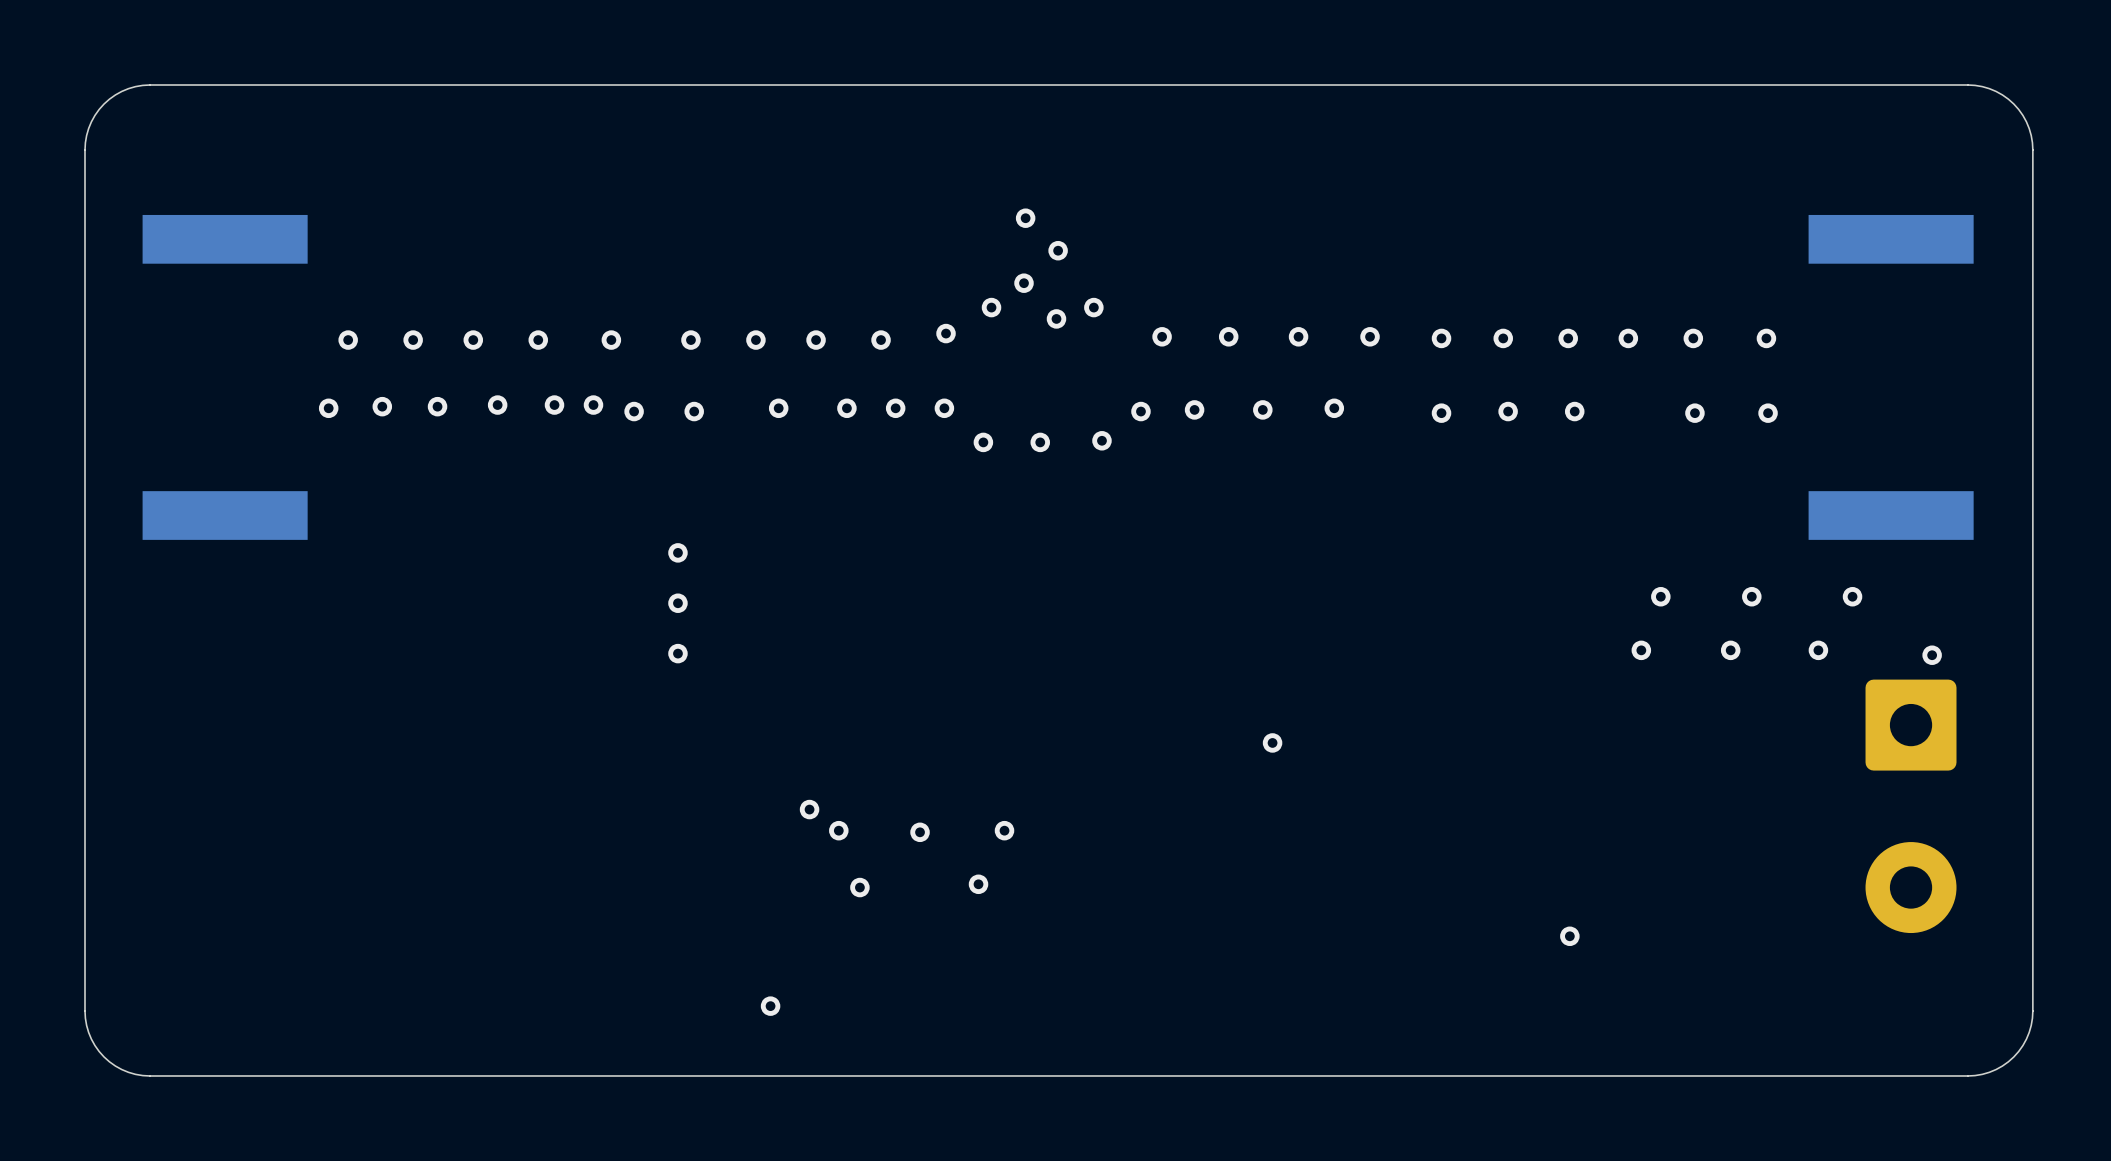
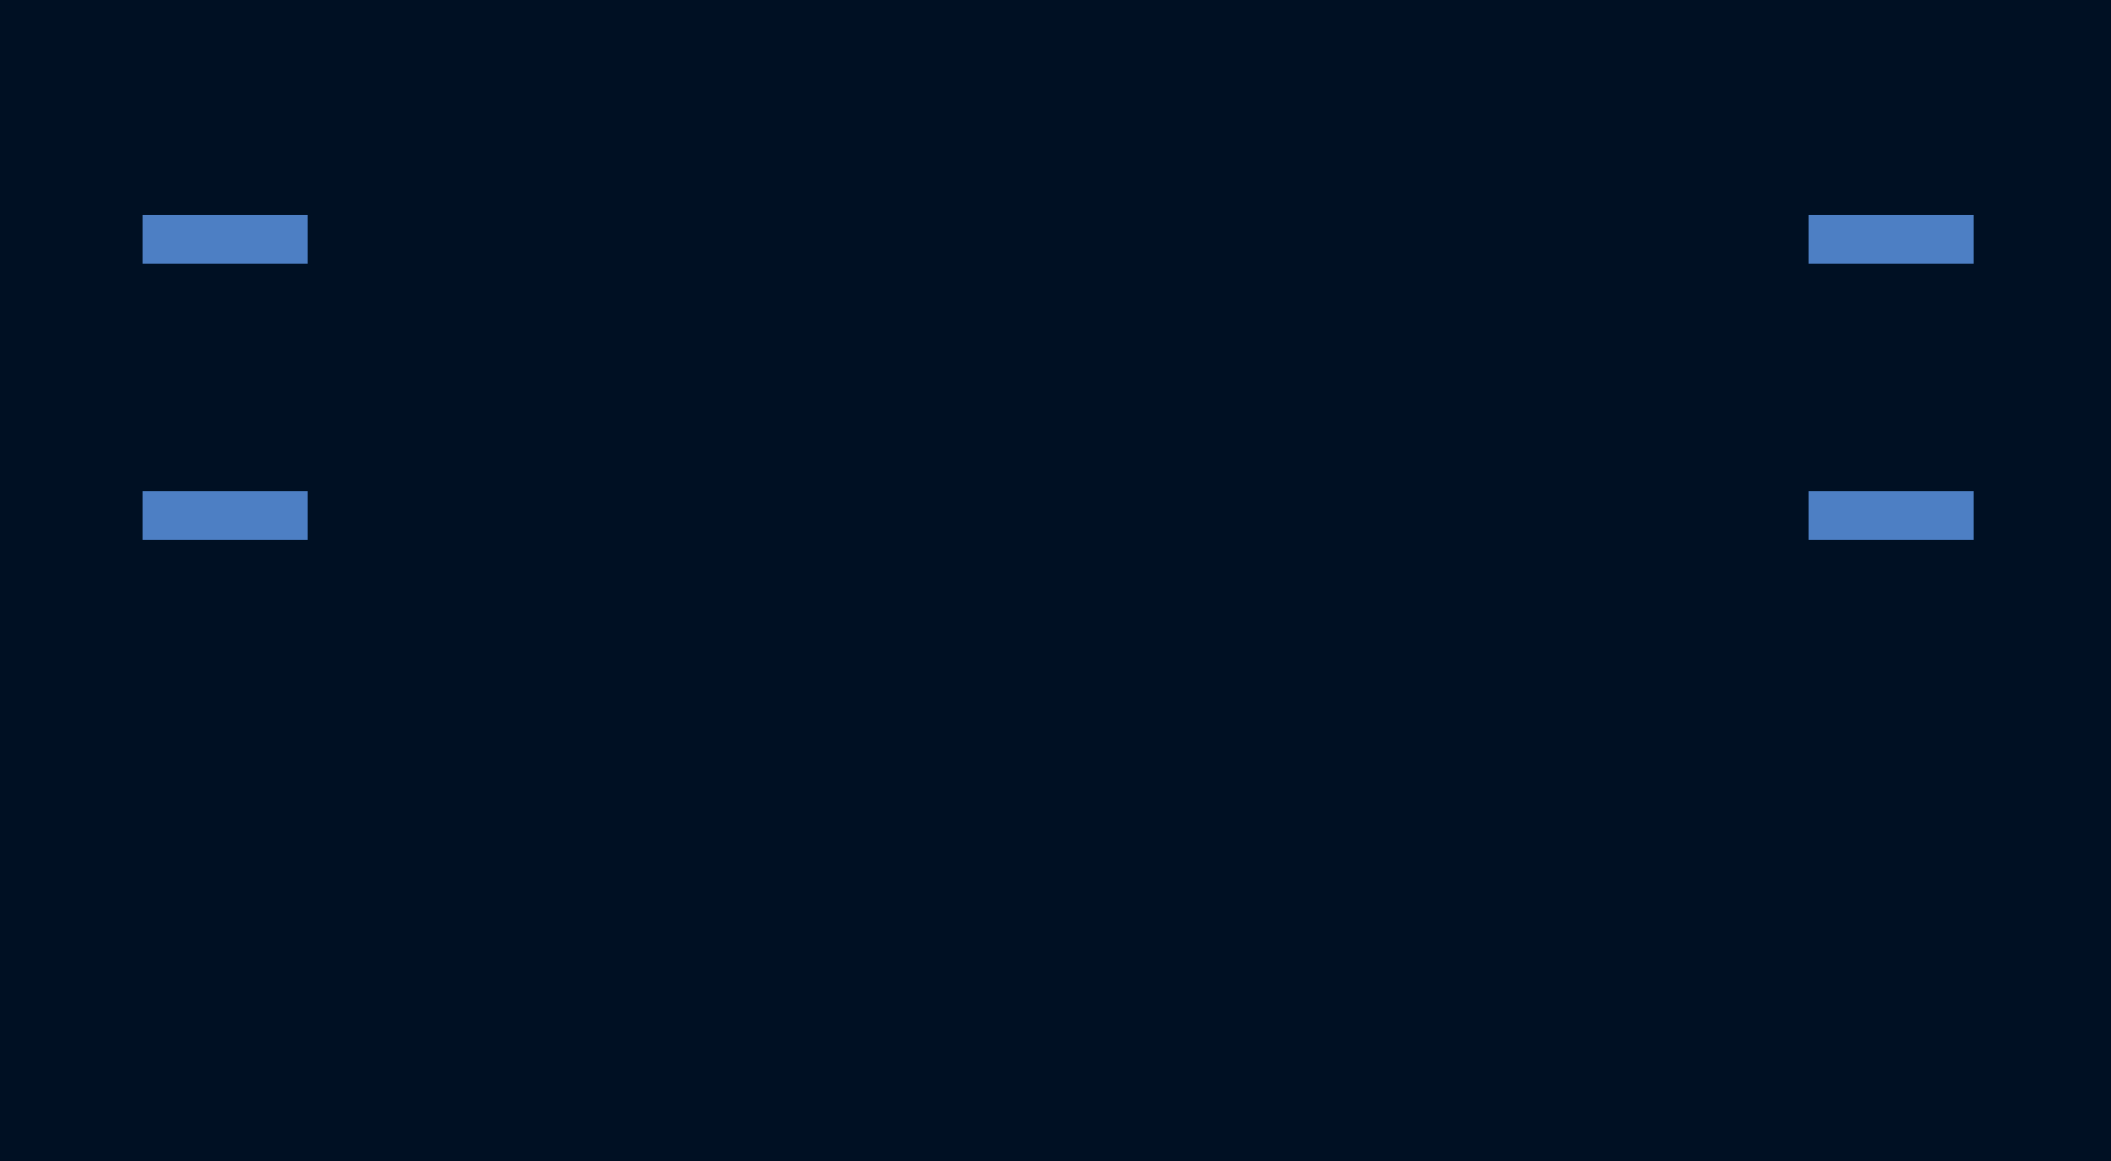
board edge: (1967, 85) (149, 85) (135, 86) (121, 91) (104, 104) (94, 115) (86, 135) (85, 149) (85, 1011) (86, 1025) (91, 1039) (99, 1051) (115, 1066) (128, 1072) (149, 1075) (1967, 1075) (1982, 1074) (1996, 1069) (2008, 1061) (2022, 1045) (2031, 1025) (2032, 1011) (2032, 149) (2031, 135) (2026, 121) (2013, 104) (1996, 91) (1982, 86) (1967, 85) -> none
via: (1025, 218) -> none
via: (1058, 250) -> none
via: (1024, 283) -> none
via: (991, 307) -> none
via: (1093, 307) -> none
via: (1056, 318) -> none
via: (946, 333) -> none
via: (1162, 336) -> none
via: (1228, 336) -> none
via: (1298, 336) -> none
via: (1370, 336) -> none
via: (1441, 338) -> none
via: (1503, 338) -> none
via: (1568, 338) -> none
via: (1628, 338) -> none
via: (1693, 338) -> none
via: (1766, 338) -> none
via: (348, 340) -> none
via: (413, 340) -> none
via: (473, 340) -> none
via: (538, 340) -> none
via: (611, 340) -> none
via: (690, 340) -> none
via: (755, 340) -> none
via: (816, 340) -> none
via: (881, 340) -> none
via: (497, 405) -> none
via: (554, 405) -> none
via: (593, 405) -> none
via: (382, 406) -> none
via: (437, 406) -> none
via: (328, 408) -> none
via: (778, 408) -> none
via: (846, 408) -> none
via: (895, 408) -> none
via: (944, 408) -> none
via: (1334, 408) -> none
via: (1194, 409) -> none
via: (1262, 409) -> none
via: (634, 411) -> none
via: (694, 411) -> none
via: (1140, 411) -> none
via: (1508, 411) -> none
via: (1574, 411) -> none
via: (1441, 413) -> none
via: (1694, 413) -> none
via: (1768, 413) -> none
via: (1101, 440) -> none
via: (983, 442) -> none
via: (1040, 442) -> none
via: (677, 552) -> none
via: (1660, 596) -> none
via: (1751, 596) -> none
via: (1852, 596) -> none
via: (677, 603) -> none
via: (1641, 650) -> none
via: (1730, 650) -> none
via: (1818, 650) -> none
via: (677, 653) -> none
via: (1932, 655) -> none
via: (1272, 742) -> none
part: (1911, 806) -> none
via: (809, 809) -> none
via: (838, 830) -> none
via: (1004, 830) -> none
via: (920, 832) -> none
via: (978, 884) -> none
via: (859, 887) -> none
via: (1569, 936) -> none
via: (770, 1006) -> none

